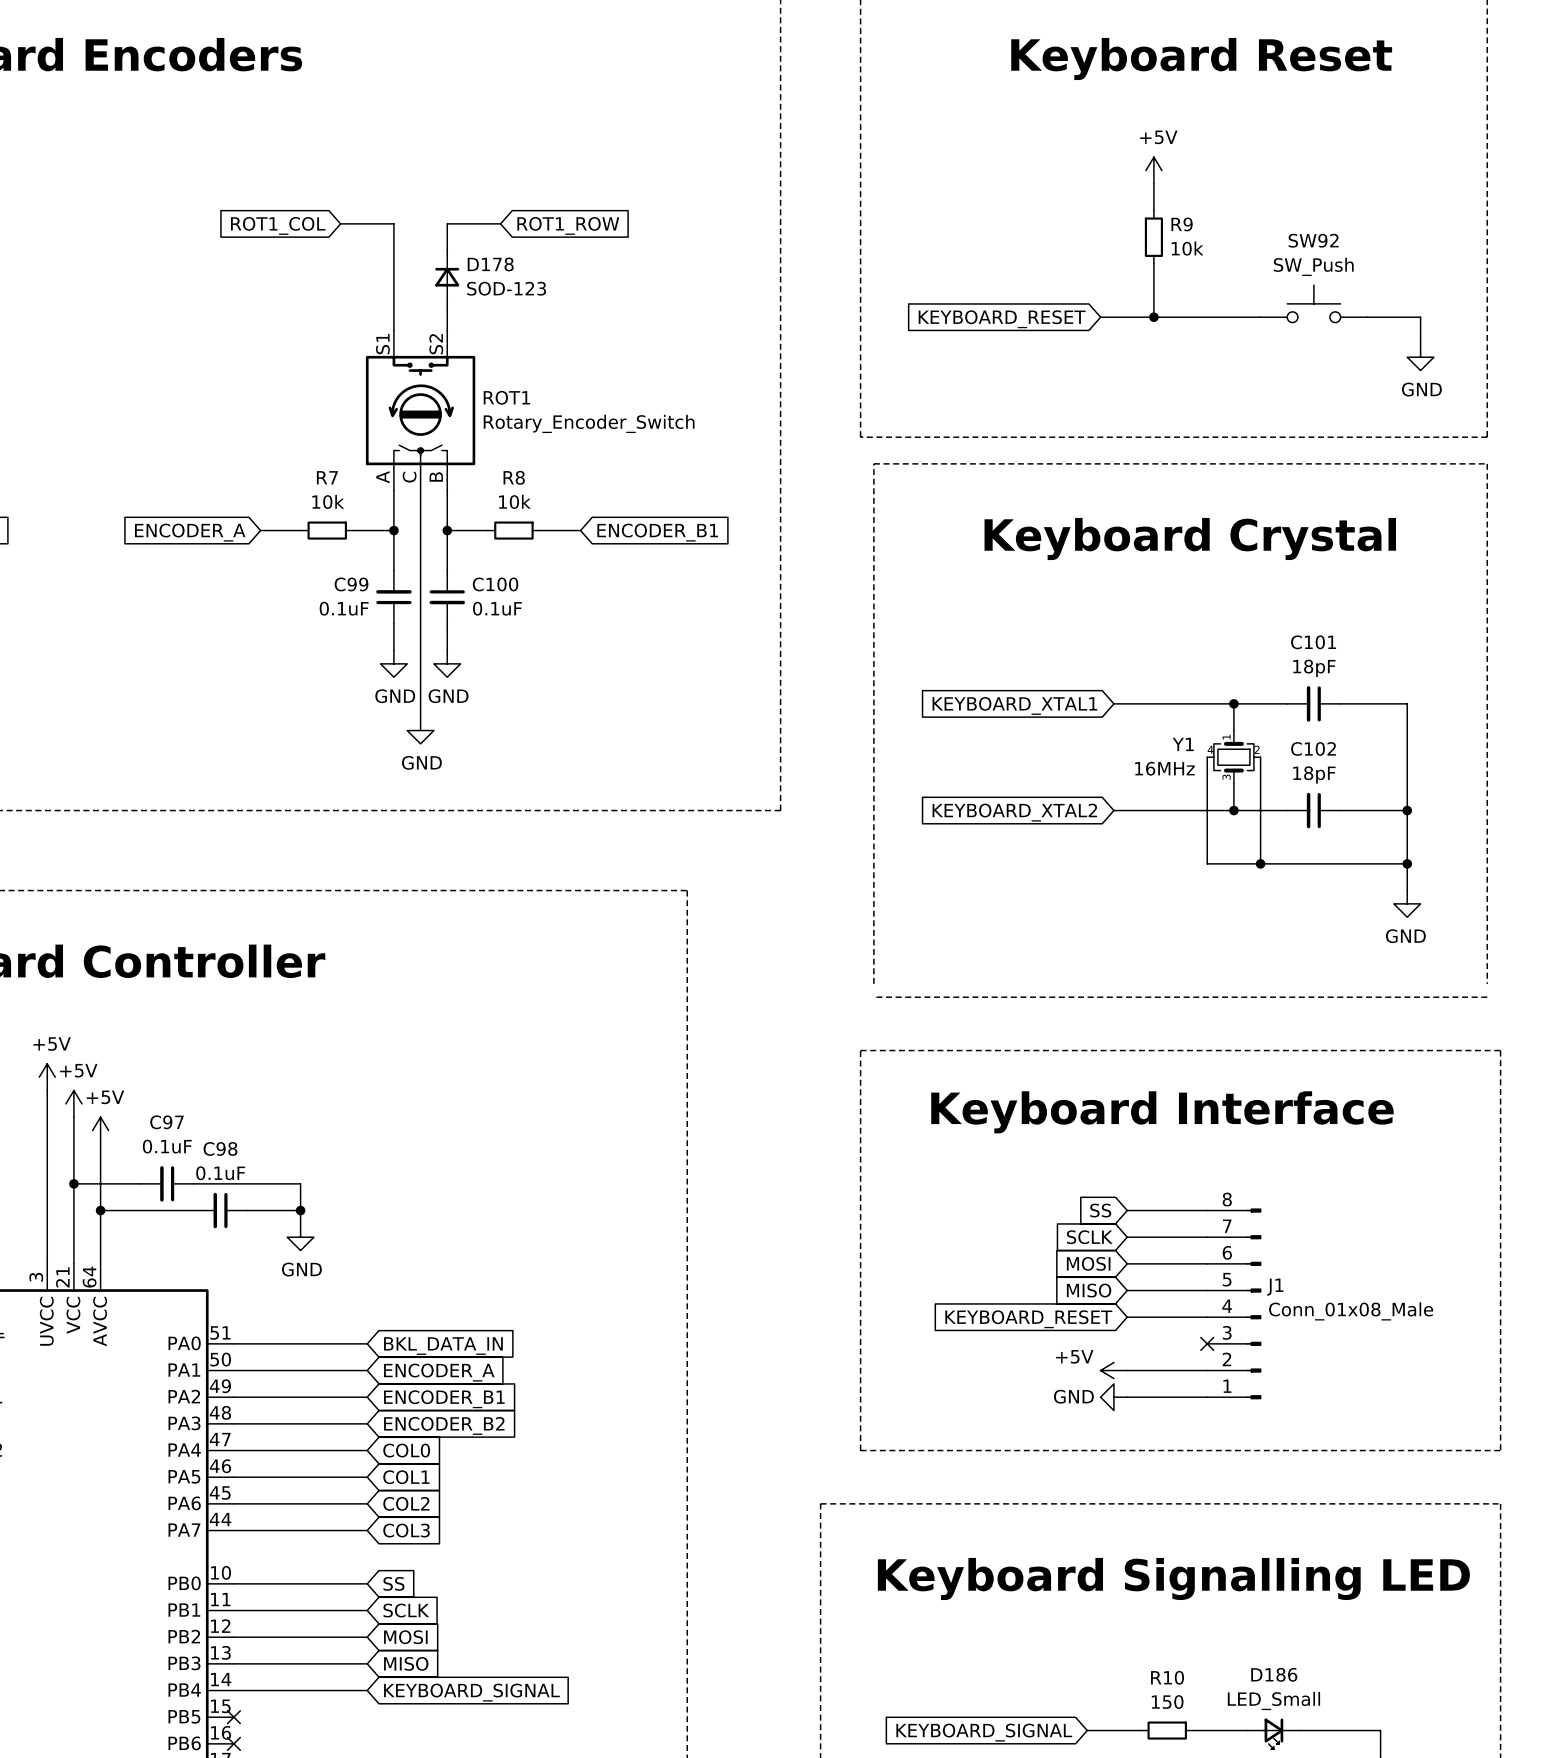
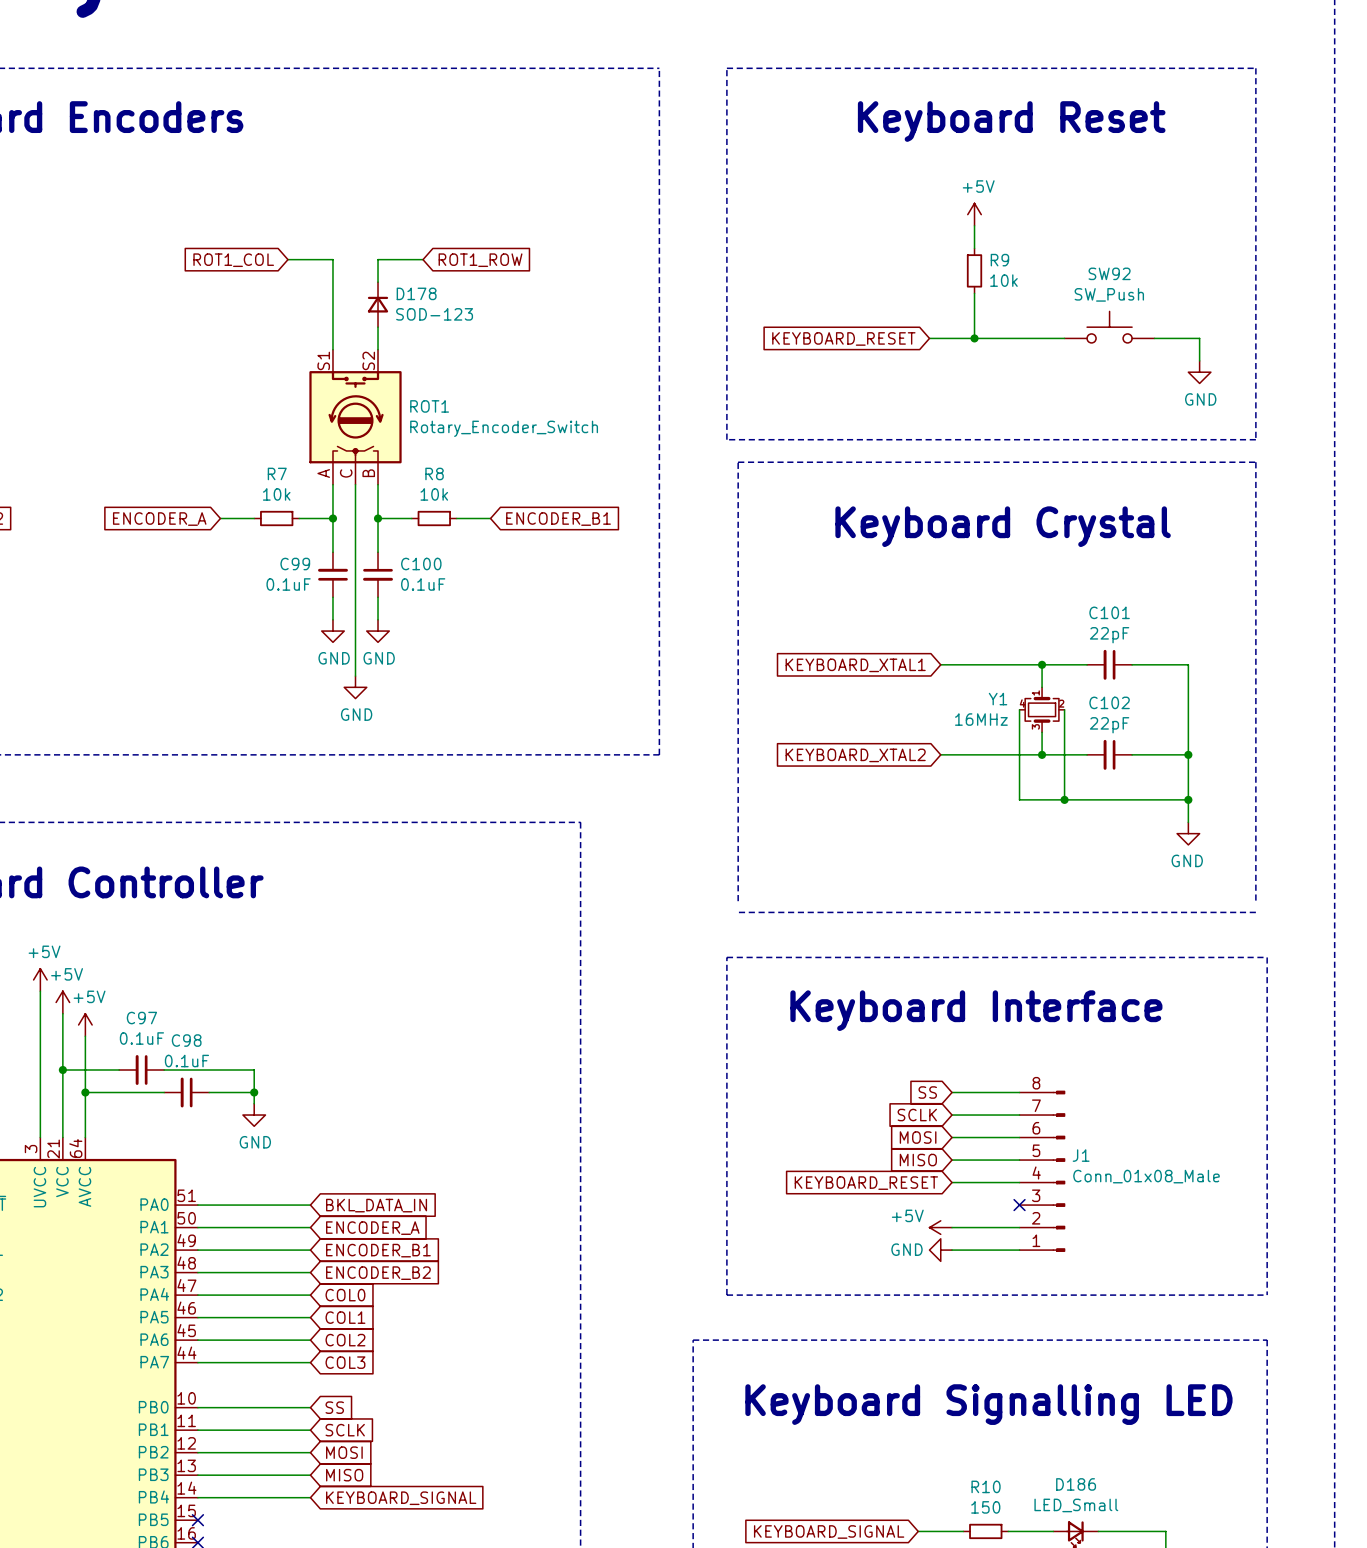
C101 value: 18pF (1314, 668) -> 22pF (1109, 635)
C102 value: 18pF (1314, 775) -> 22pF (1109, 725)

